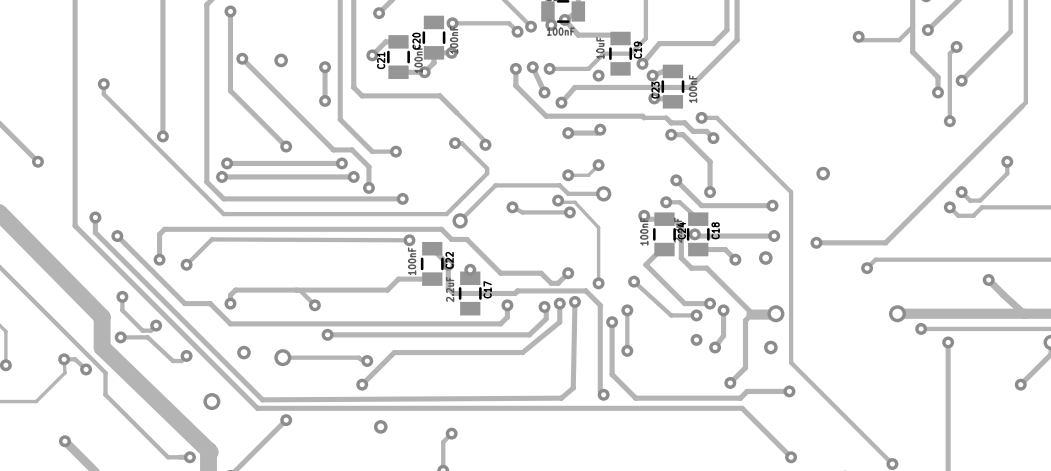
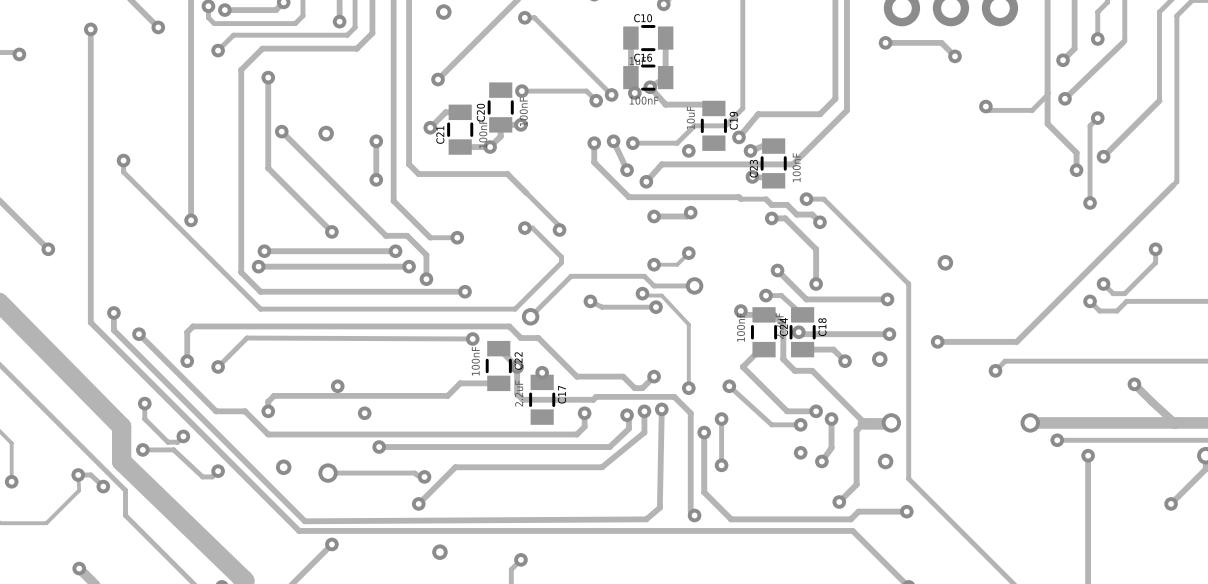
via: none -> (337, 386)
track: (296, 290) (299, 290) (314, 305) -> none
via: (211, 401) -> none

